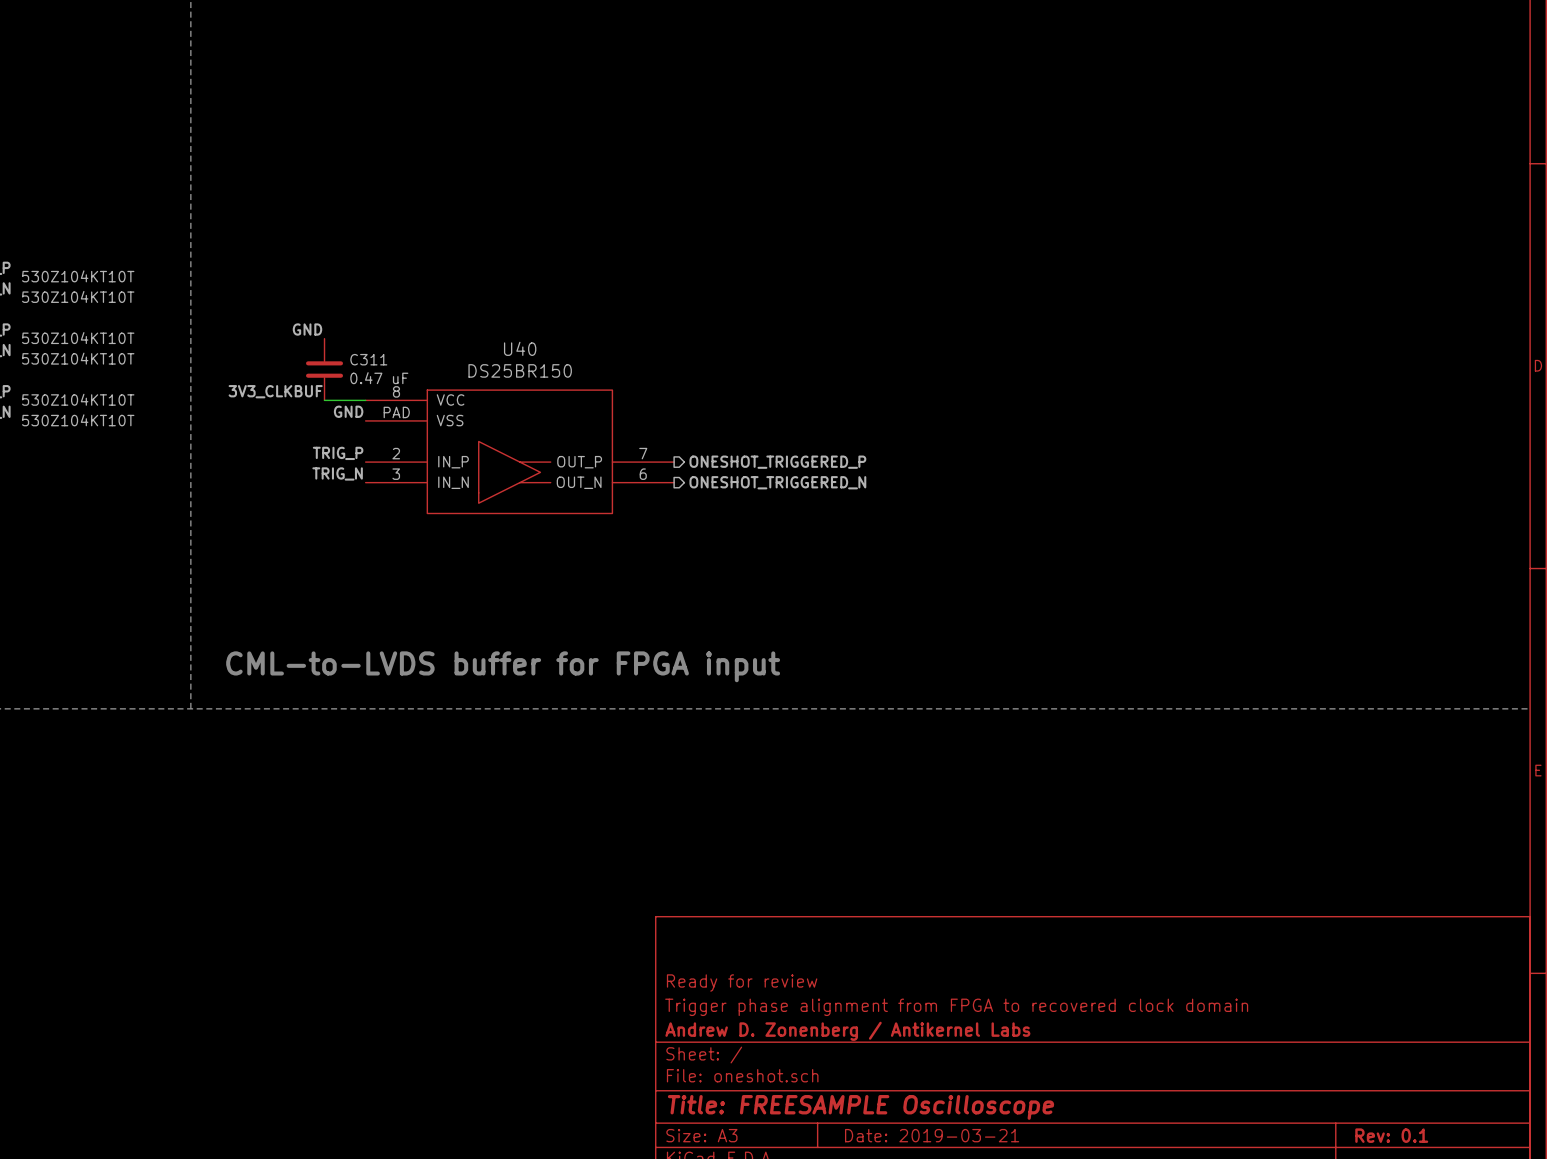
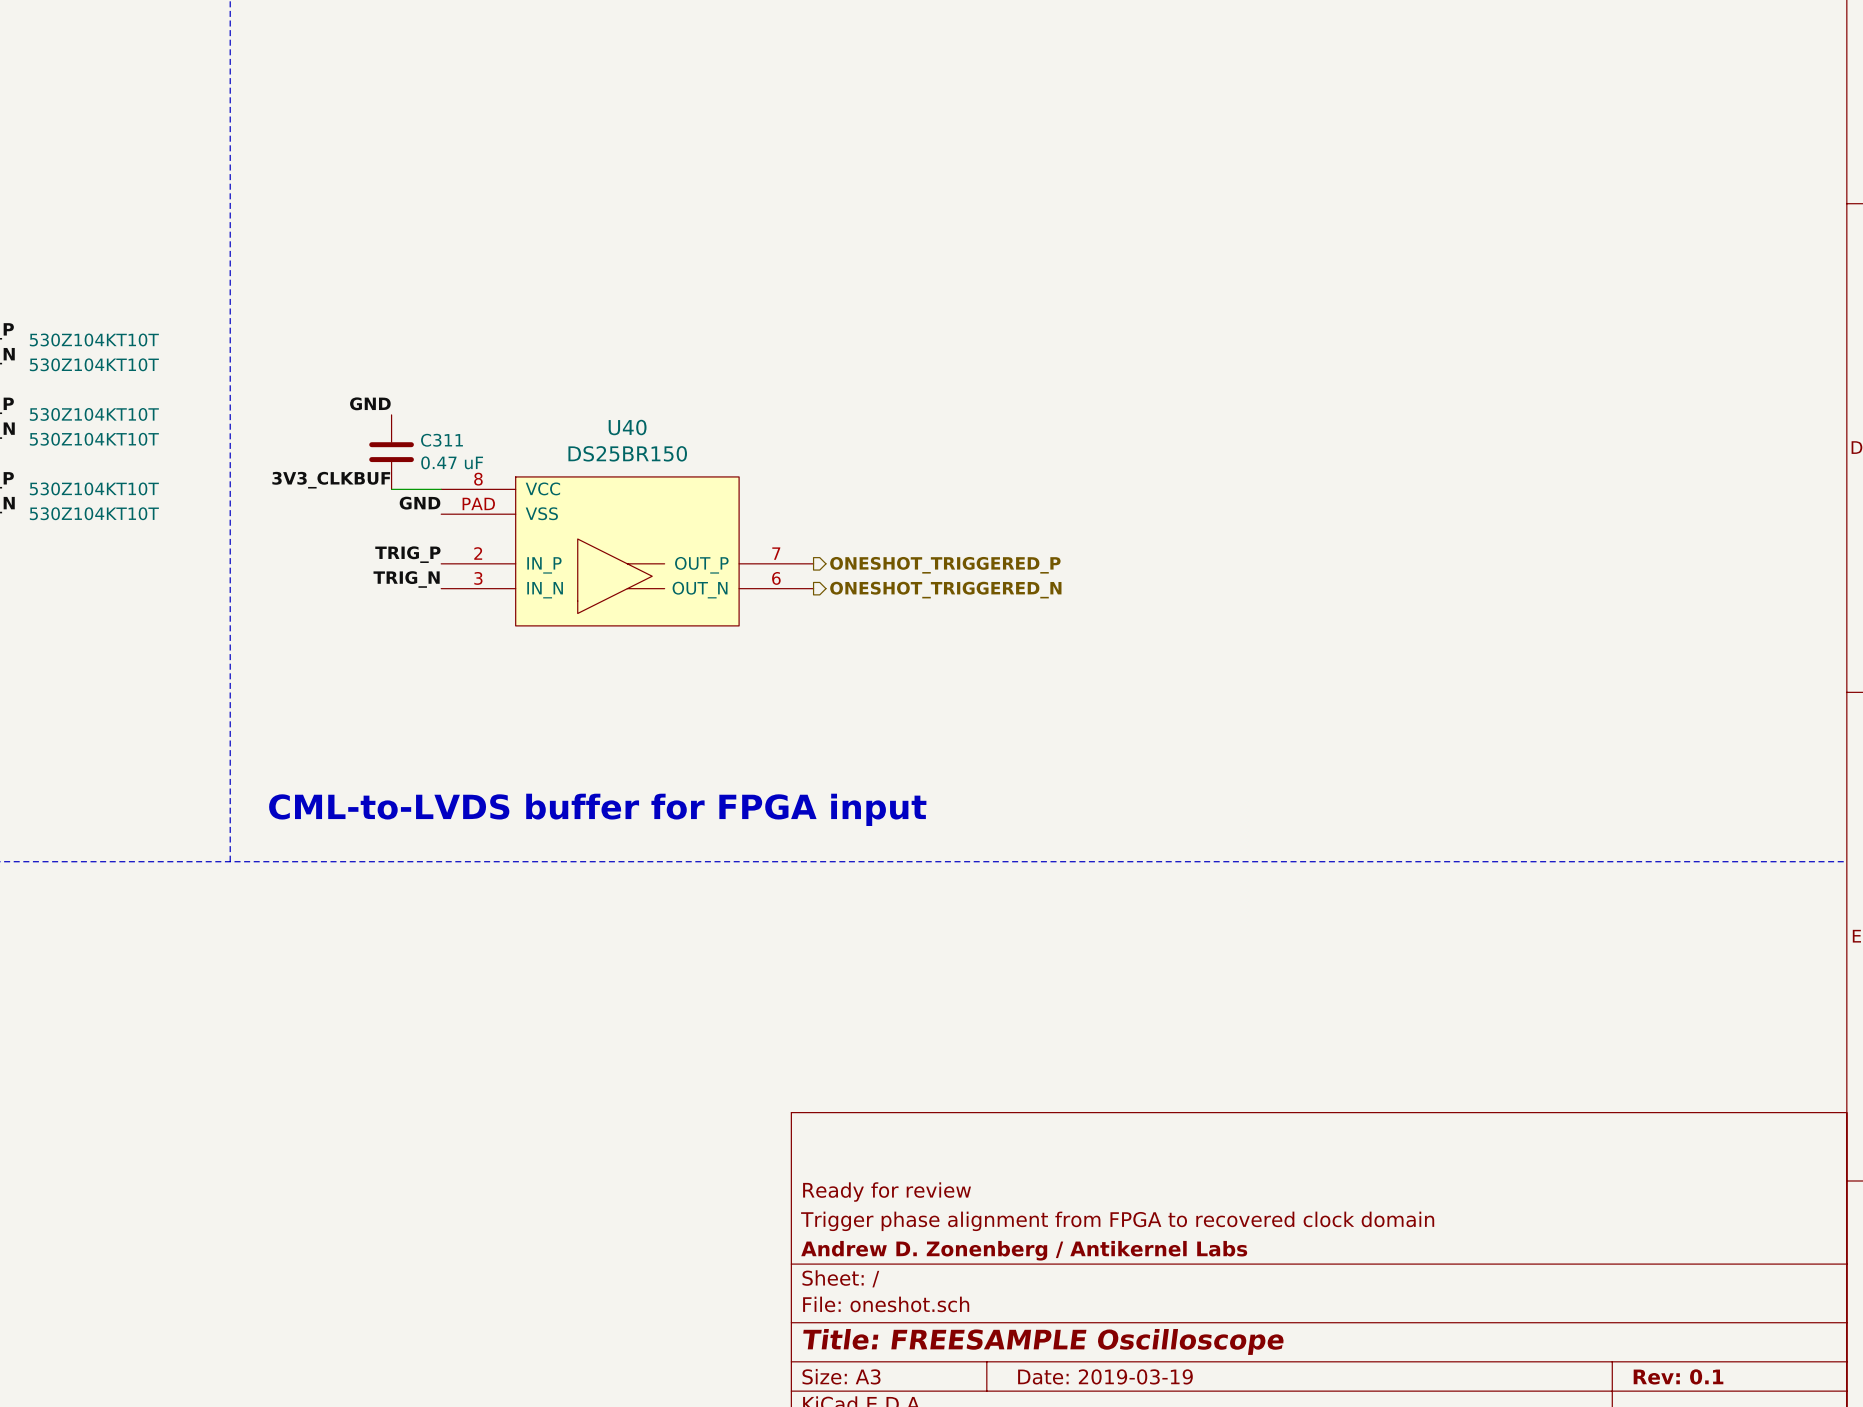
title block: Date: 2019-03-21 (932, 1135) -> Date: 2019-03-19 (1105, 1376)

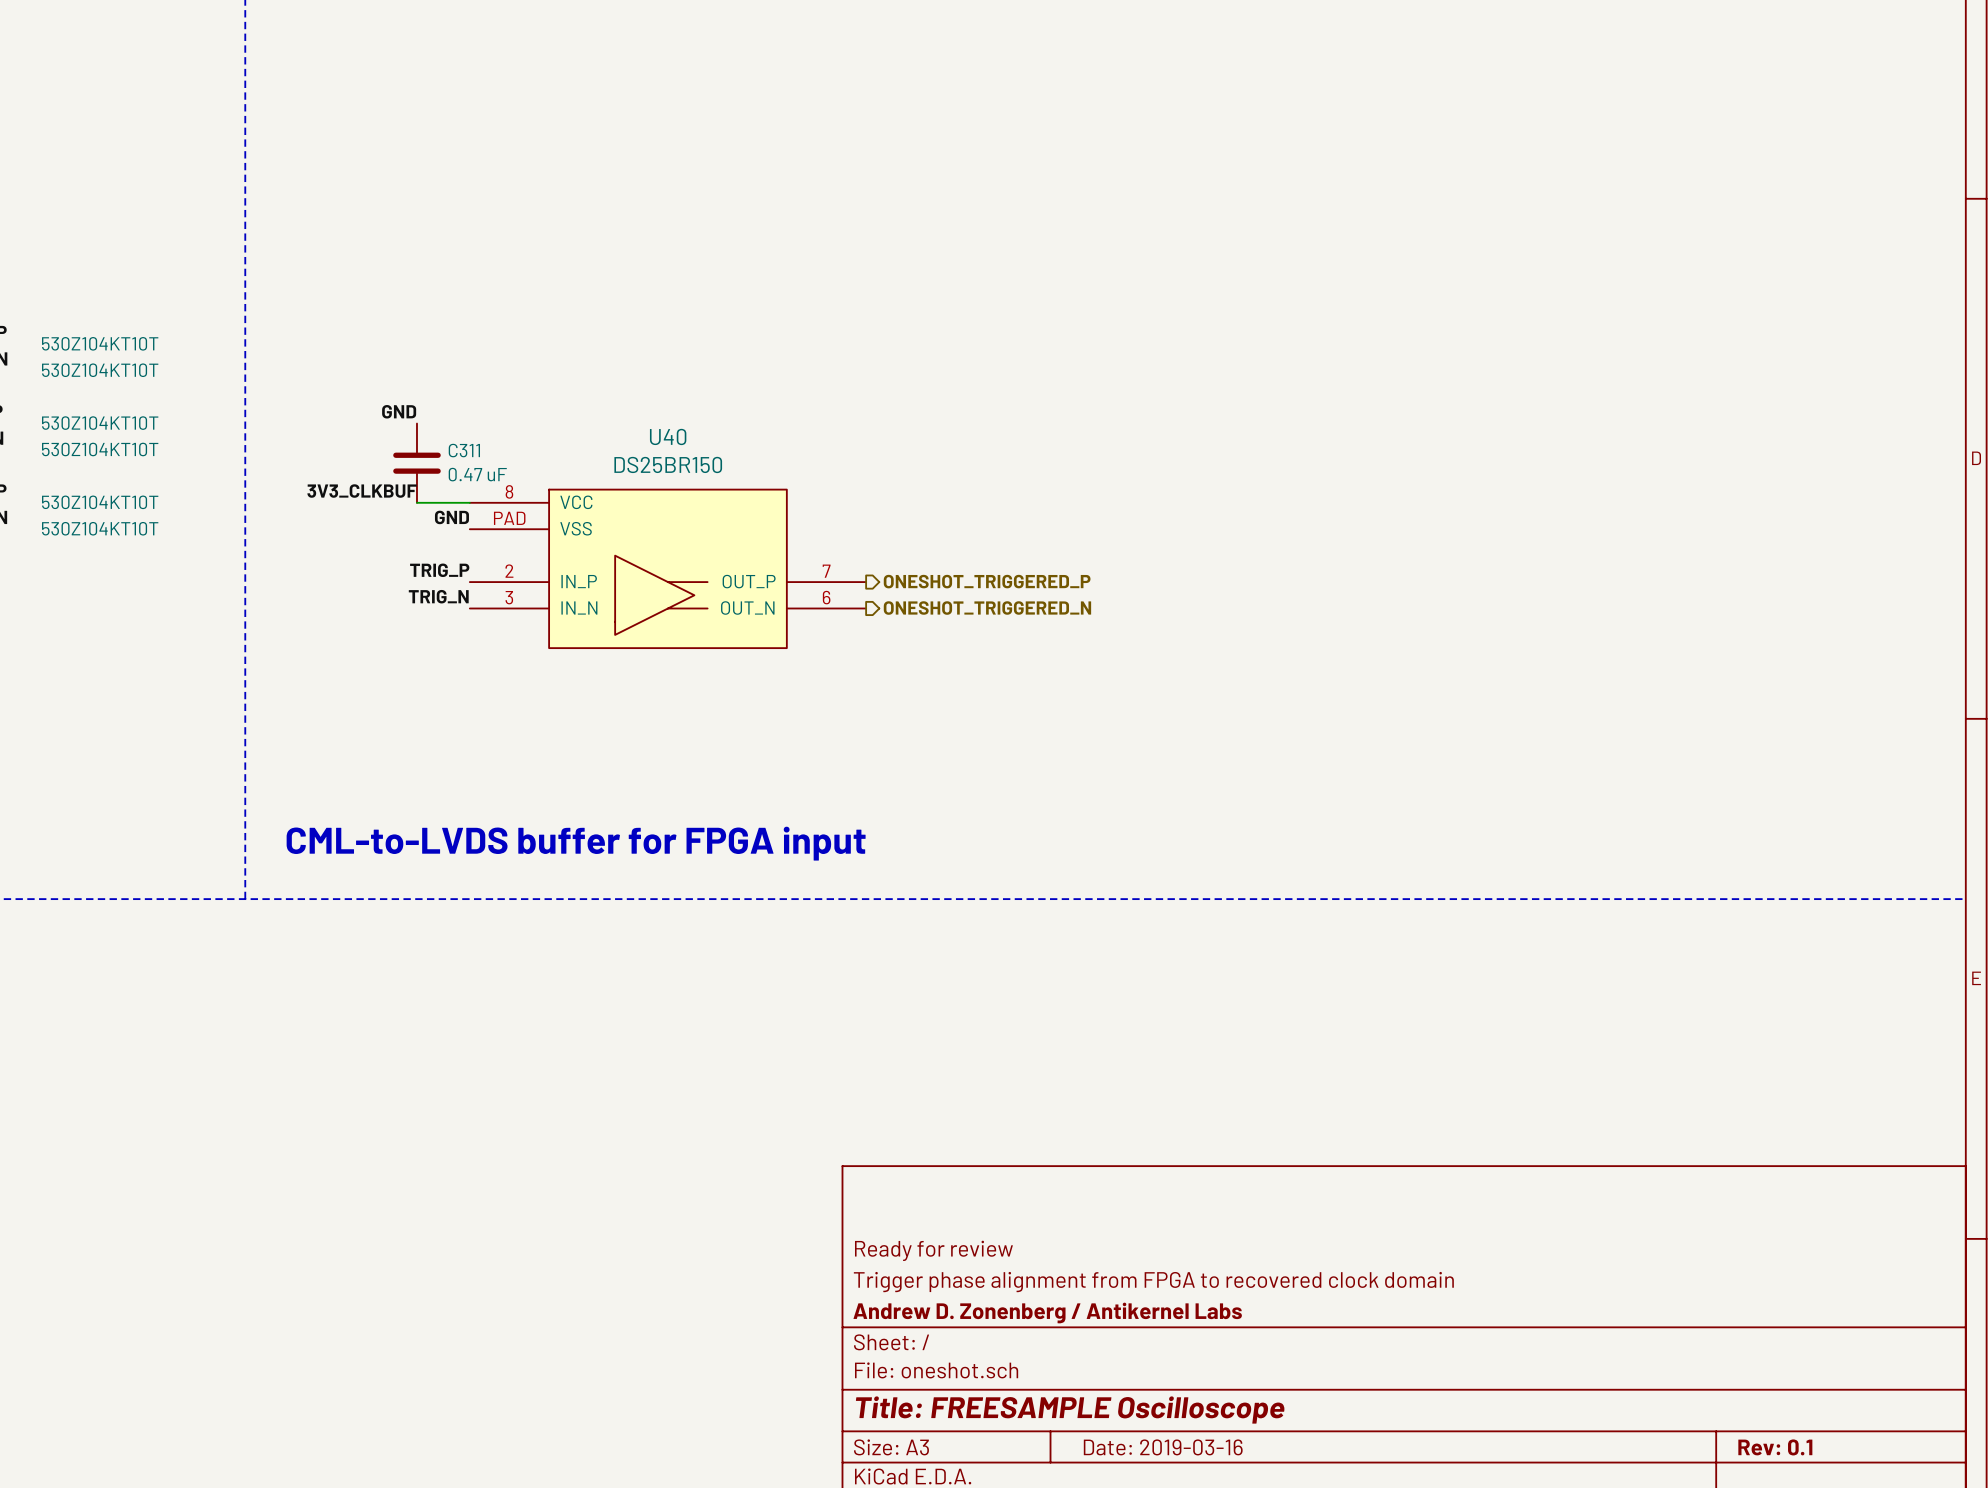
title block: Date: 2019-03-19 (1105, 1376) -> Date: 2019-03-16 (1163, 1447)

